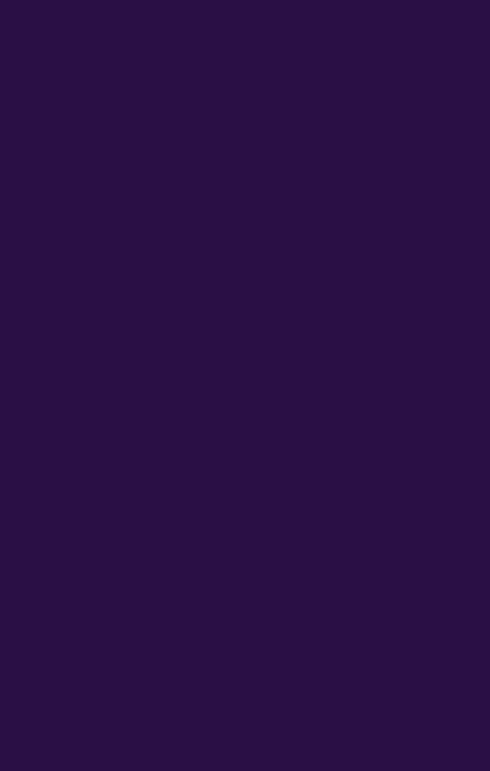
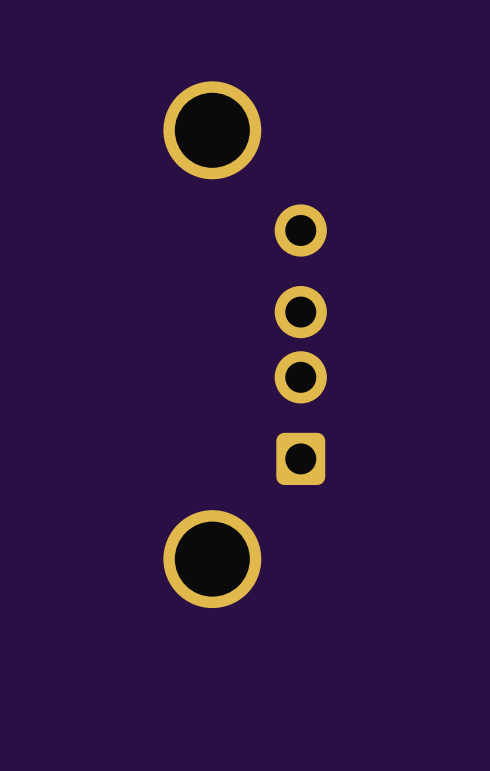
part: none -> (245, 344)

